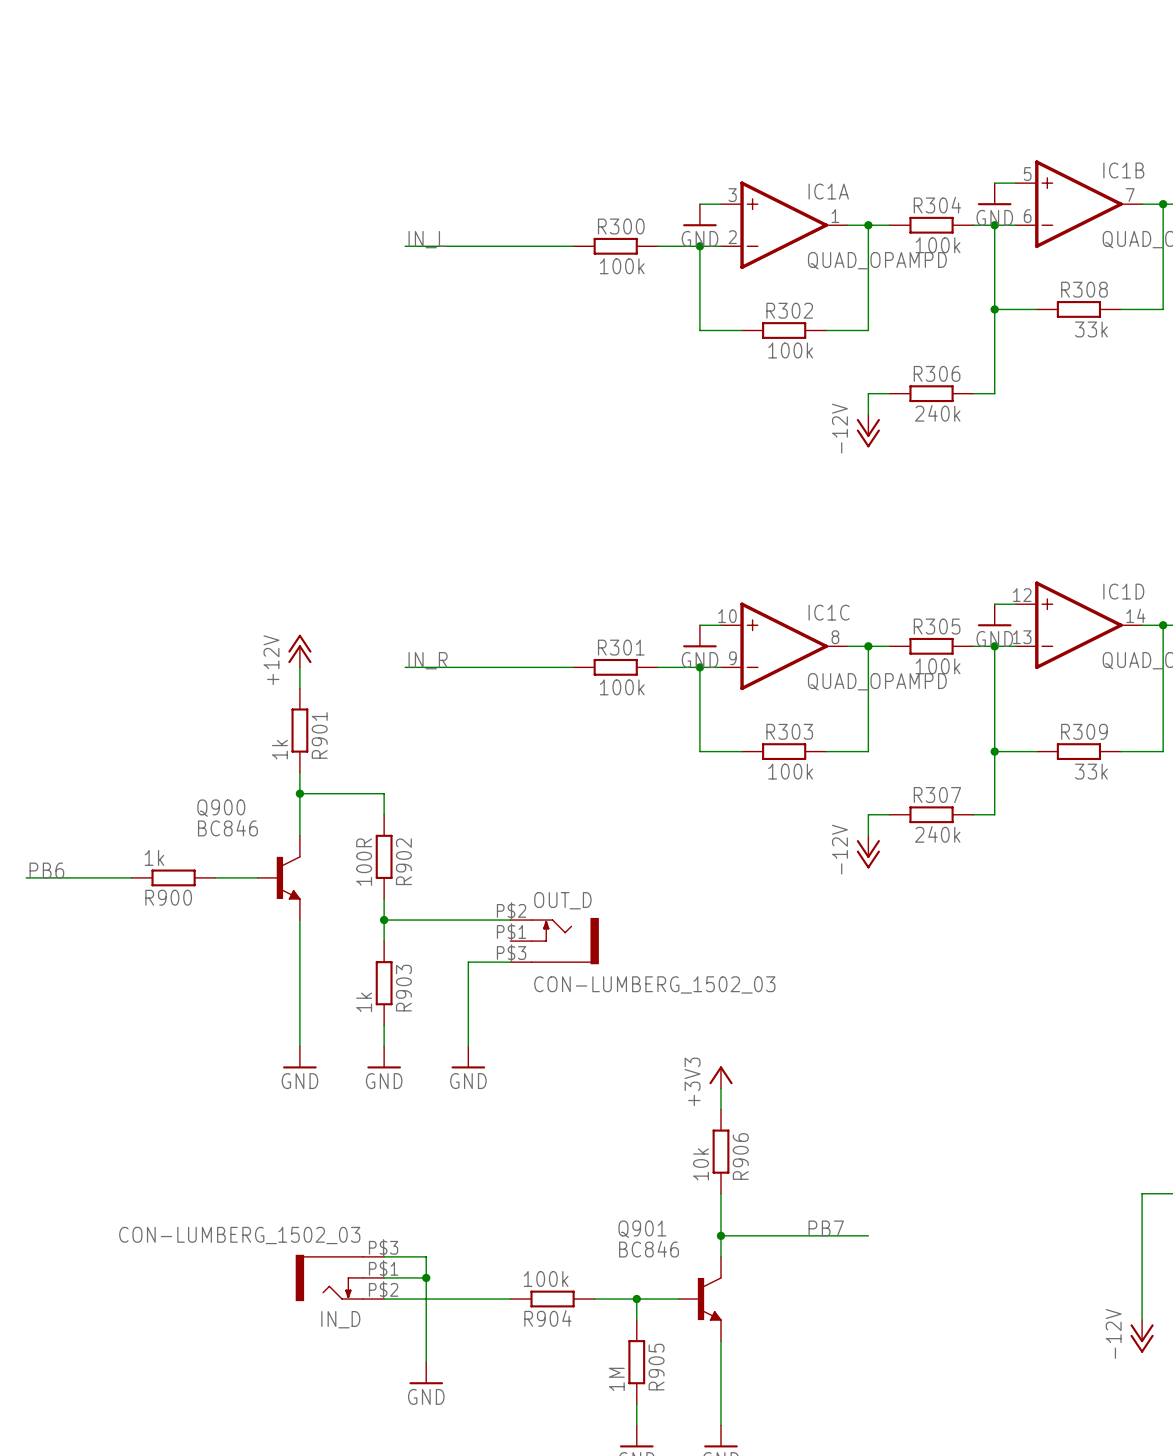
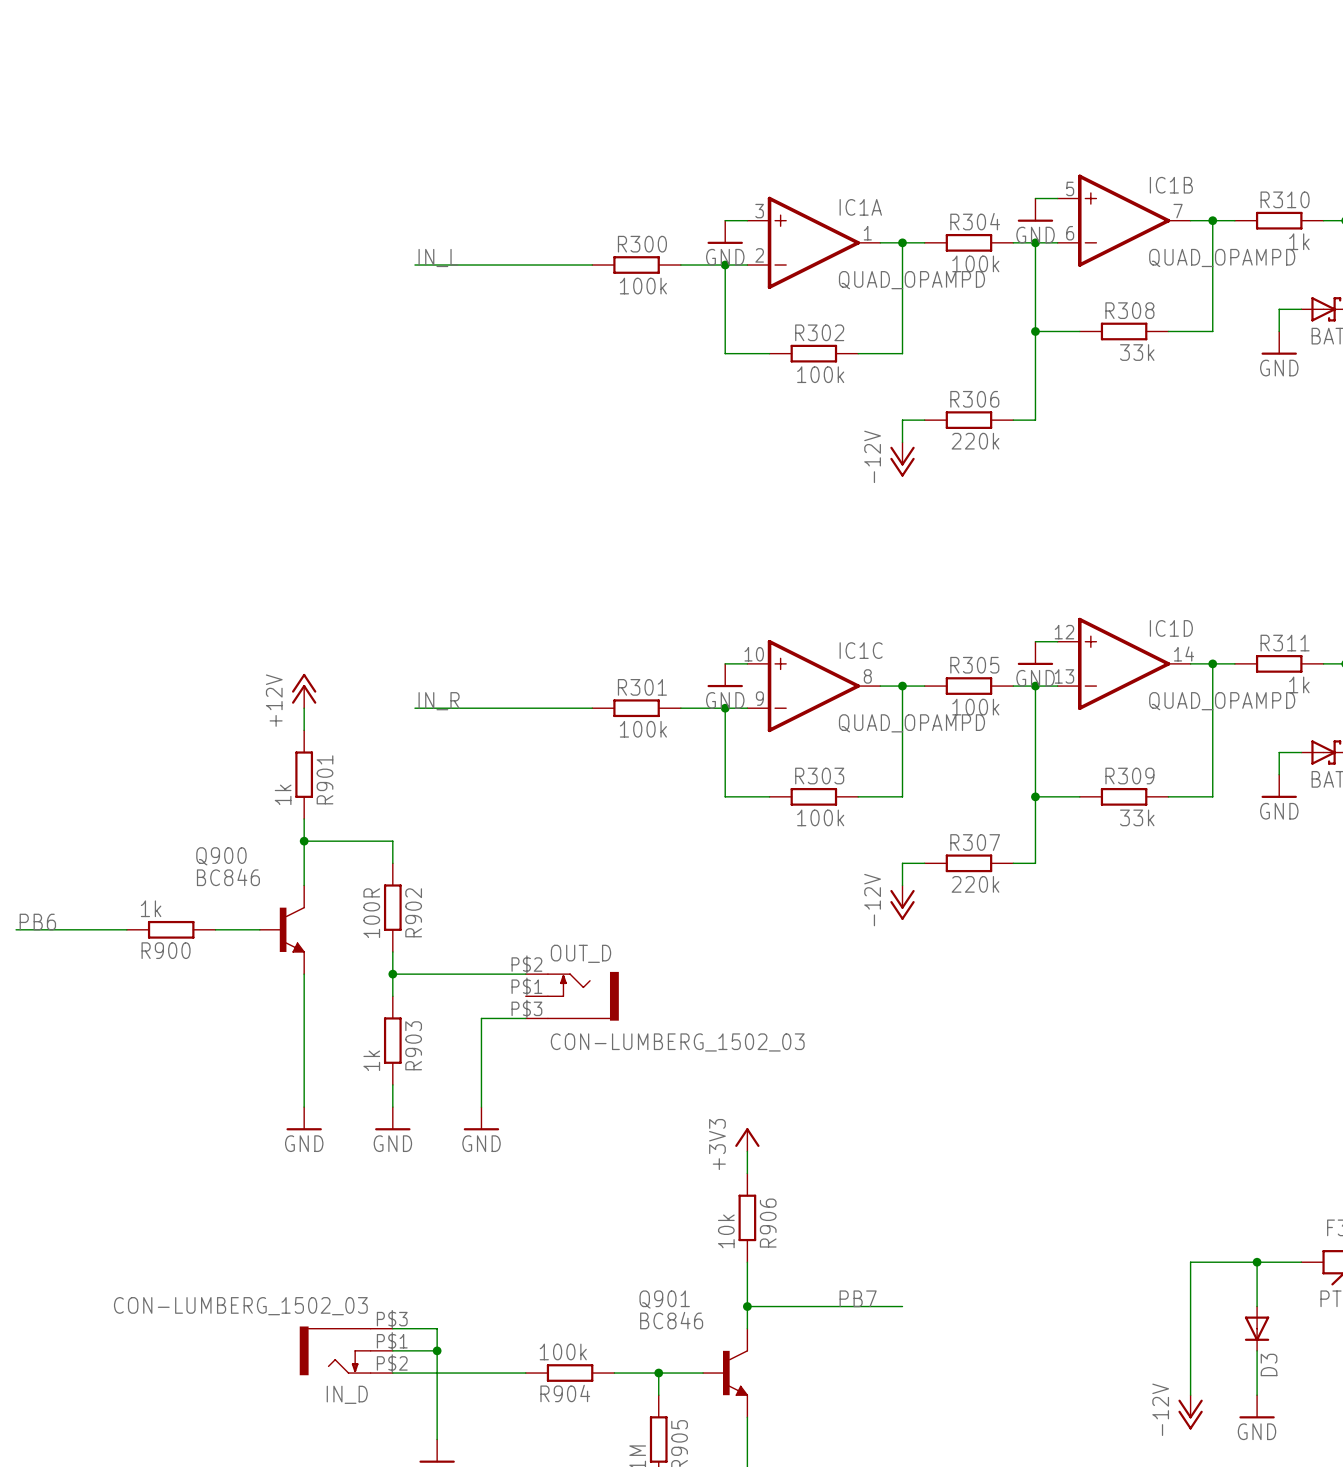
R306 value: 240k (937, 413) -> 220k (975, 441)
R307 value: 240k (937, 834) -> 220k (975, 884)

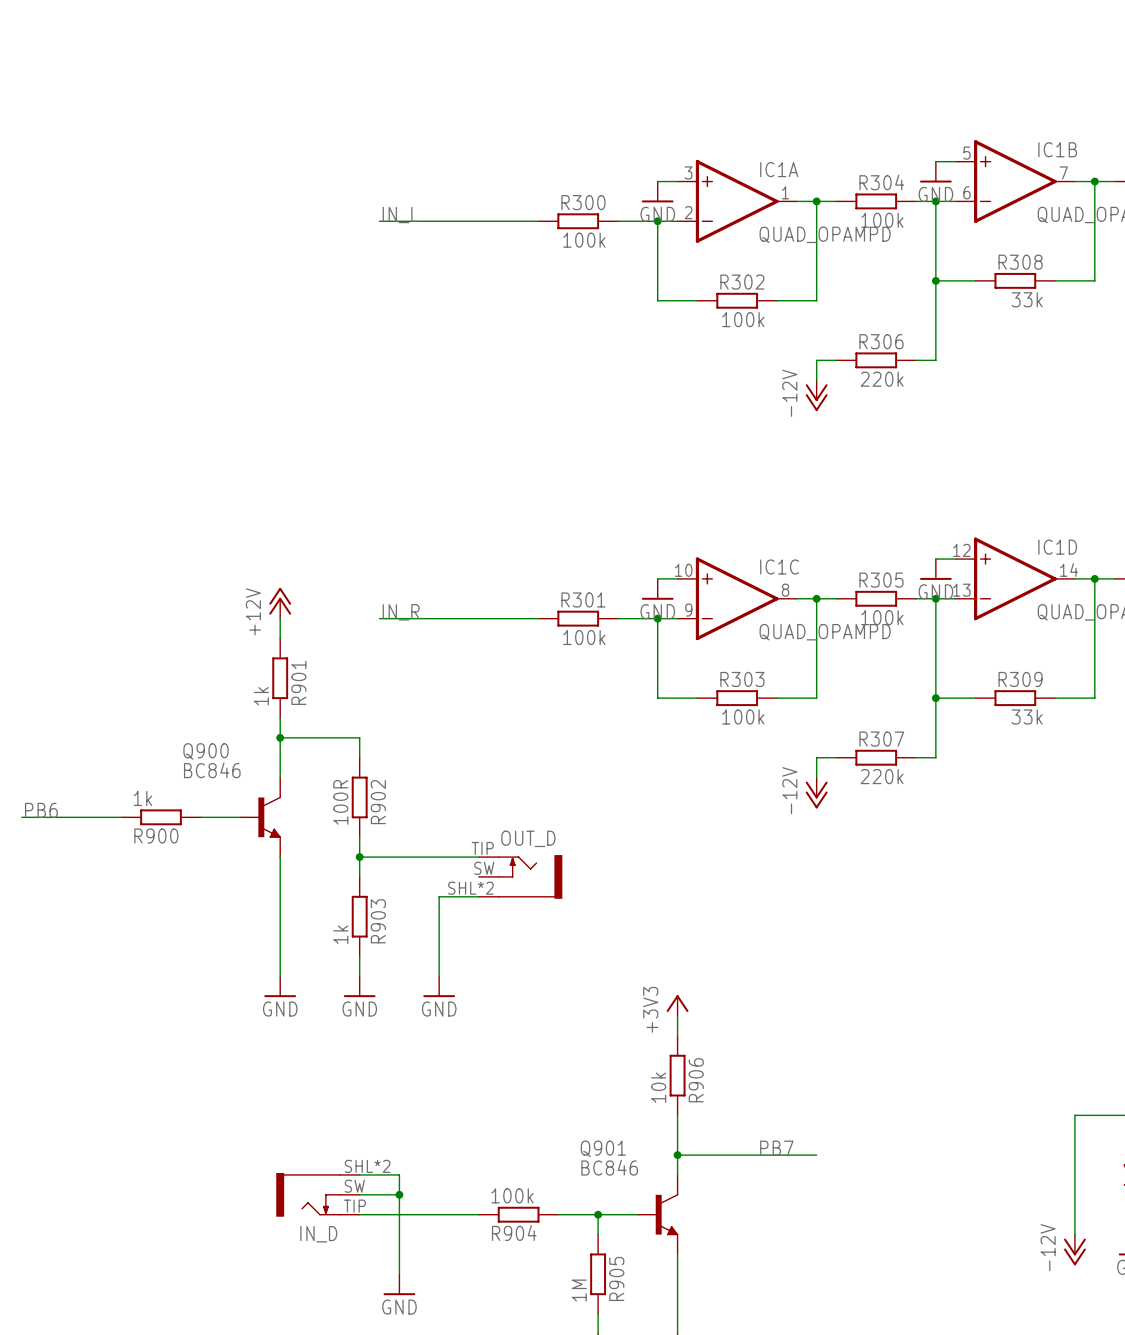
OUT_D pin number: P$2 (526, 964) -> TIP (482, 848)
OUT_D pin number: P$1 (526, 986) -> SW (484, 868)
OUT_D pin number: P$3 (526, 1008) -> SHL*2 (470, 888)
OUT_D value: CON-LUMBERG_1502_03 (677, 1042) -> none
IN_D value: CON-LUMBERG_1502_03 (240, 1306) -> none
IN_D pin number: P$3 (392, 1319) -> SHL*2 (367, 1166)
IN_D pin number: P$1 (392, 1341) -> SW (354, 1186)
IN_D pin number: P$2 (392, 1363) -> TIP (354, 1206)

